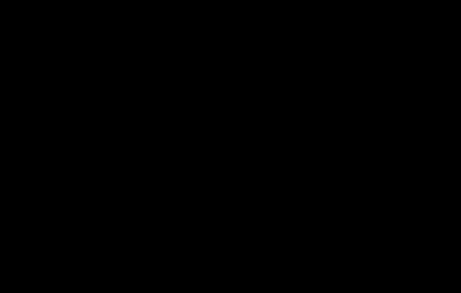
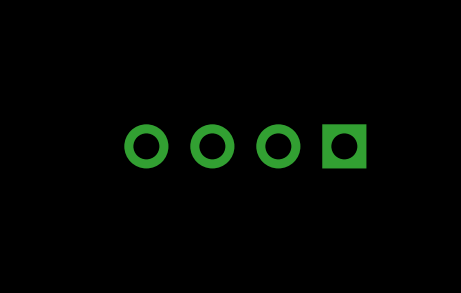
part: none -> (245, 146)

